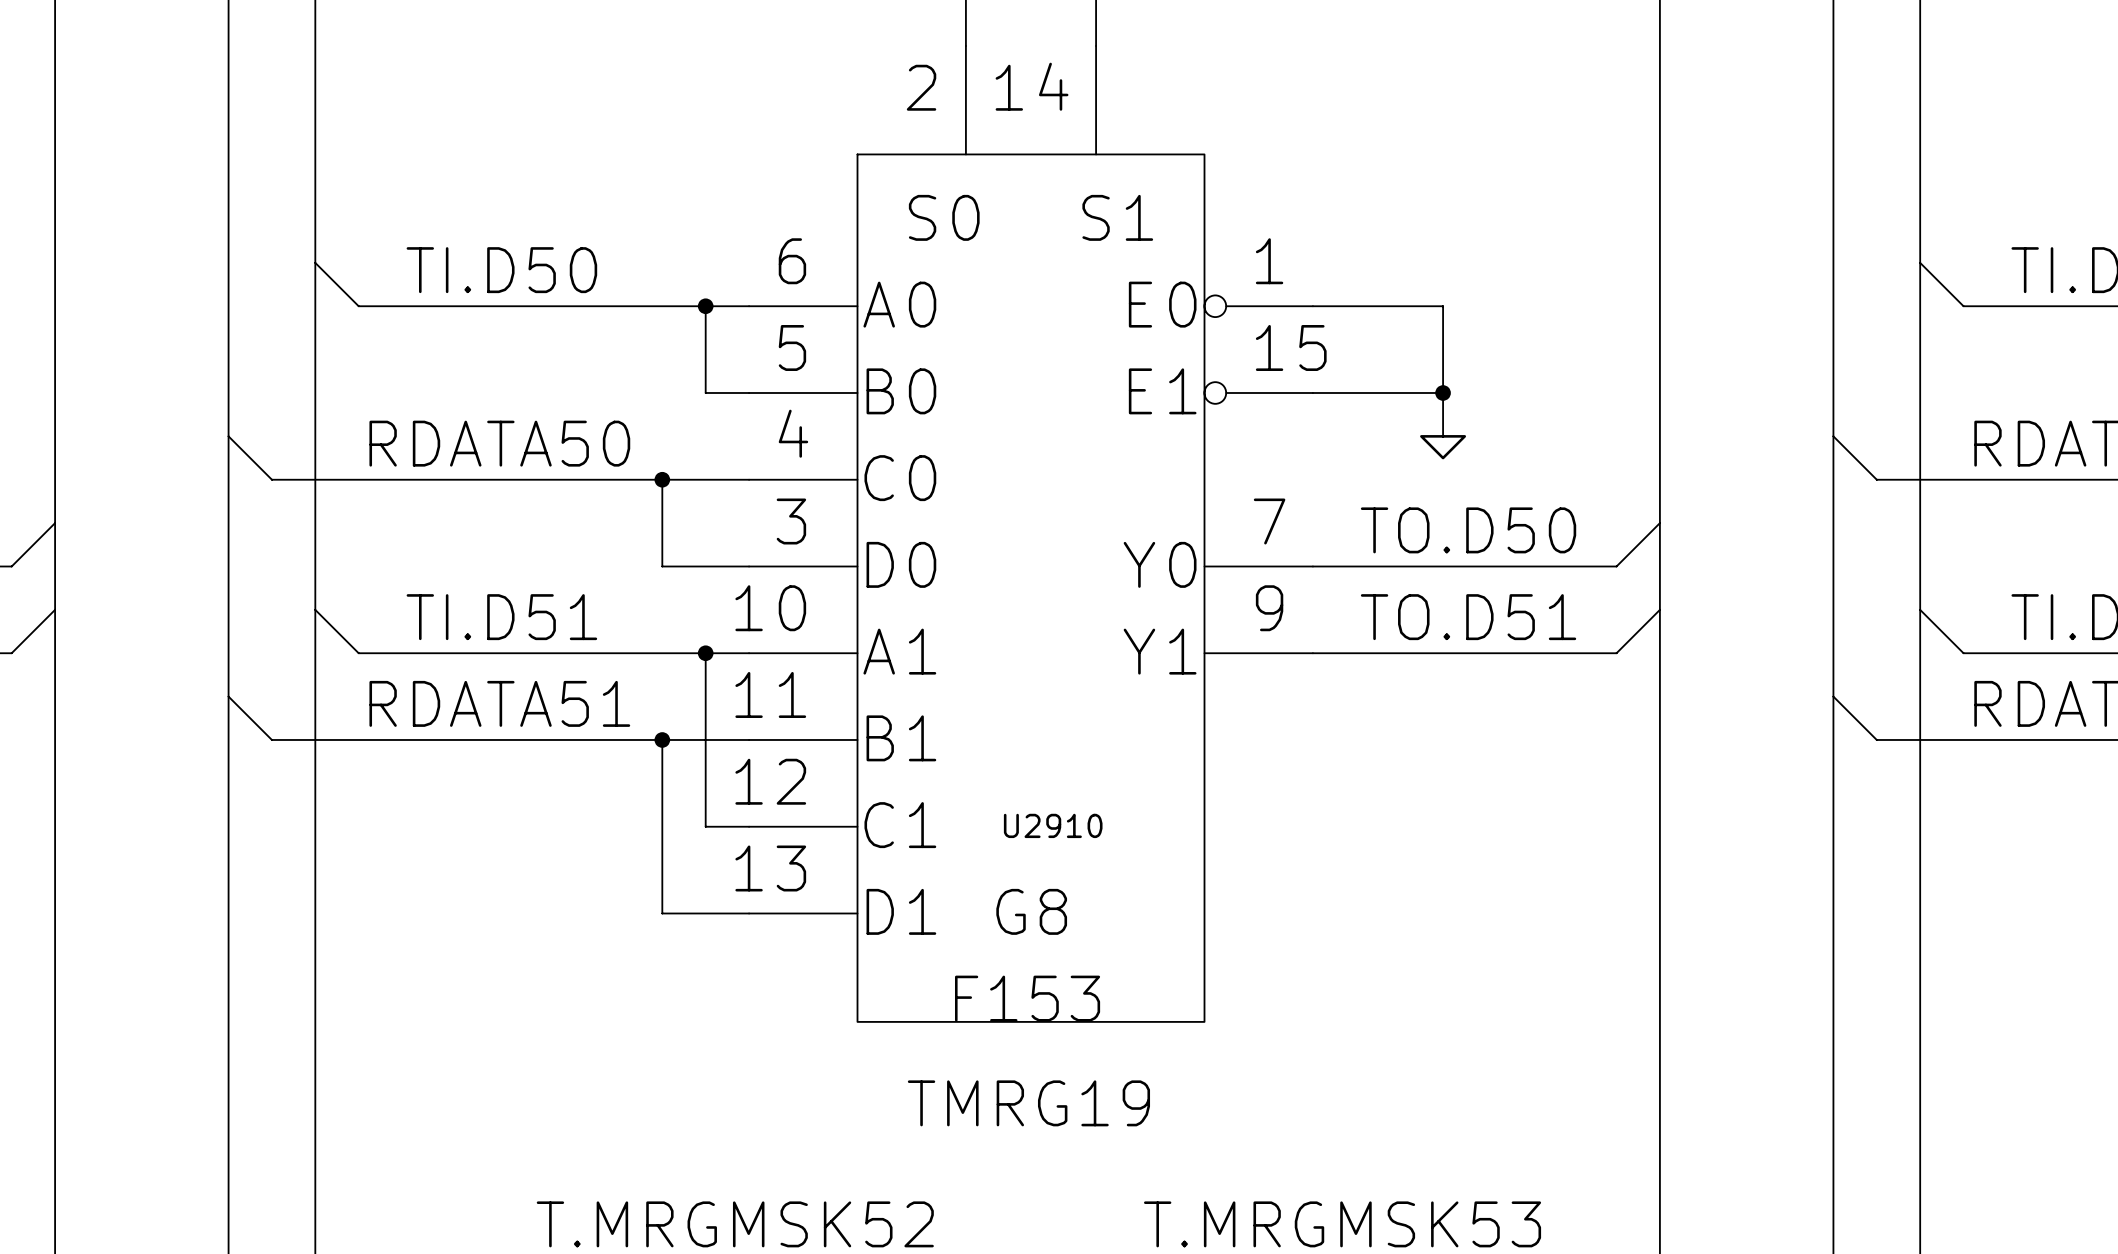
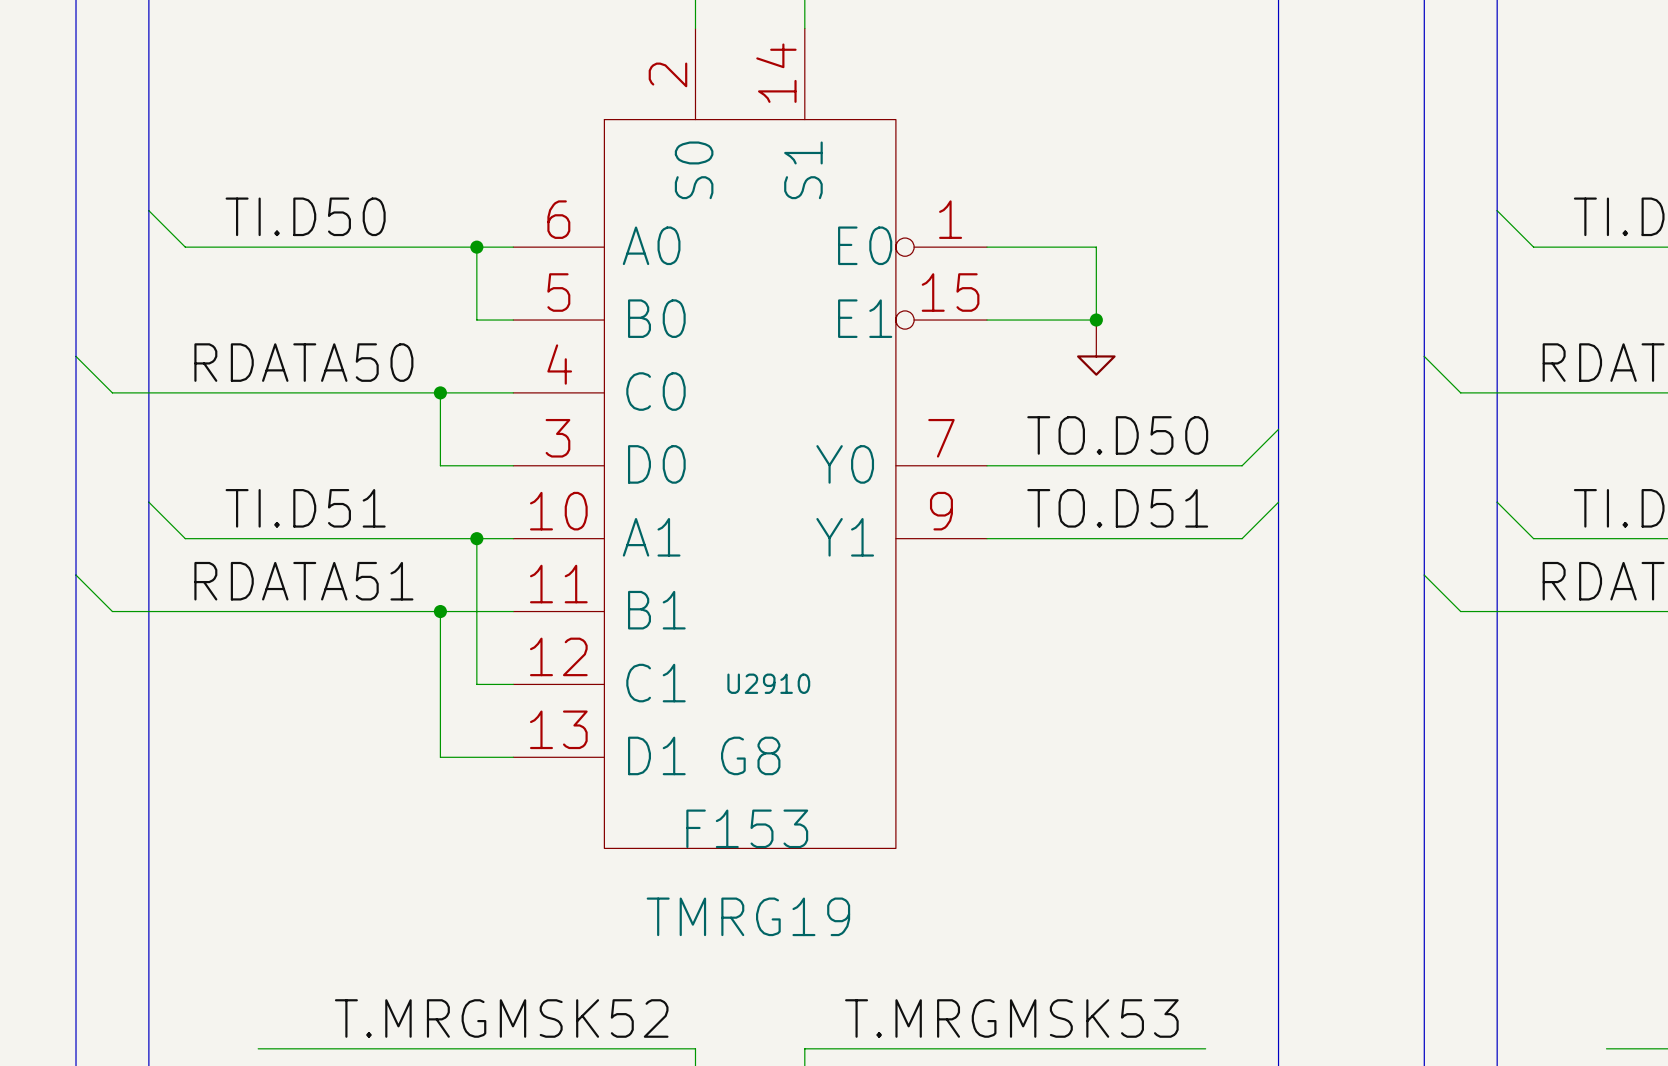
U2910 symbol: [749, 45, 1313, 1022] -> [513, 28, 988, 849]

